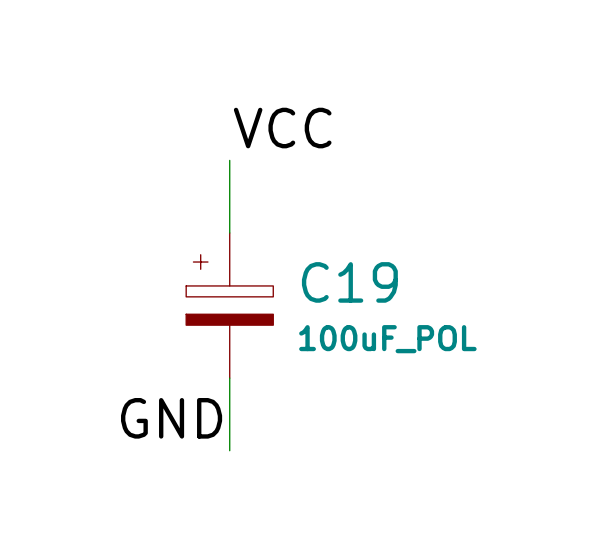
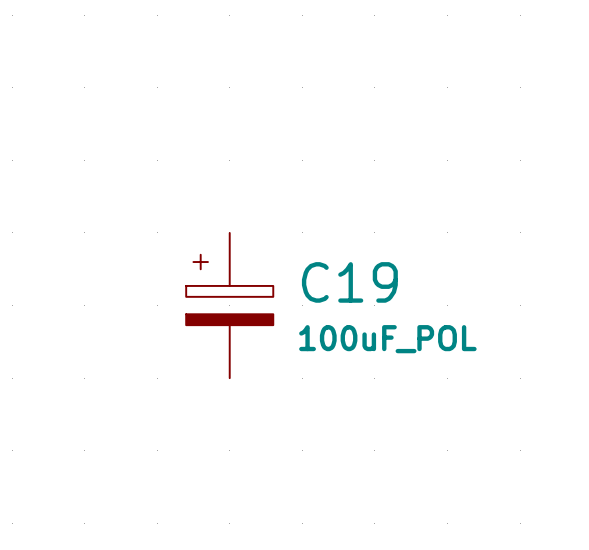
label: VCC (282, 128) -> none
wire: (229, 160) (229, 232) -> none
wire: (229, 378) (229, 450) -> none
label: GND (171, 418) -> none

